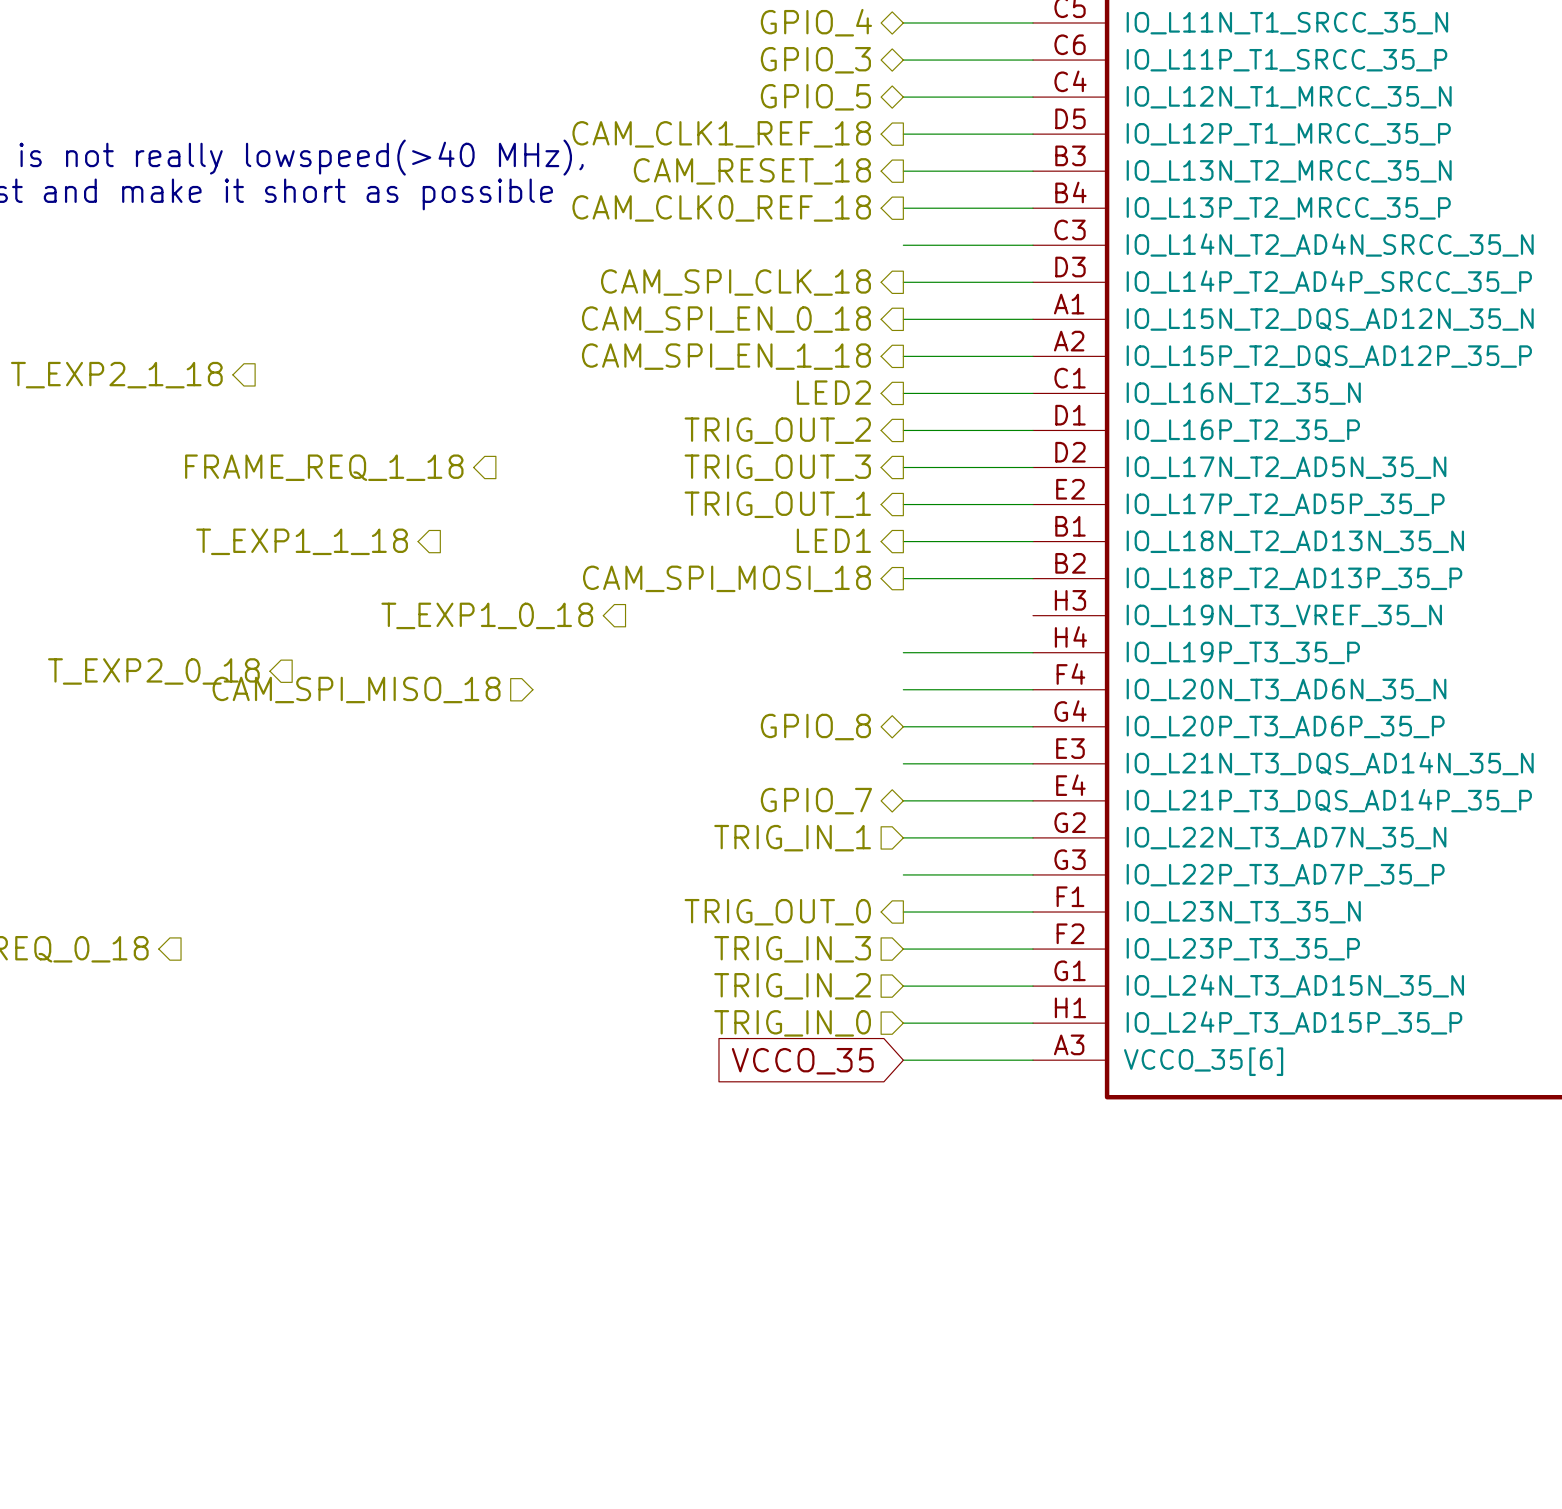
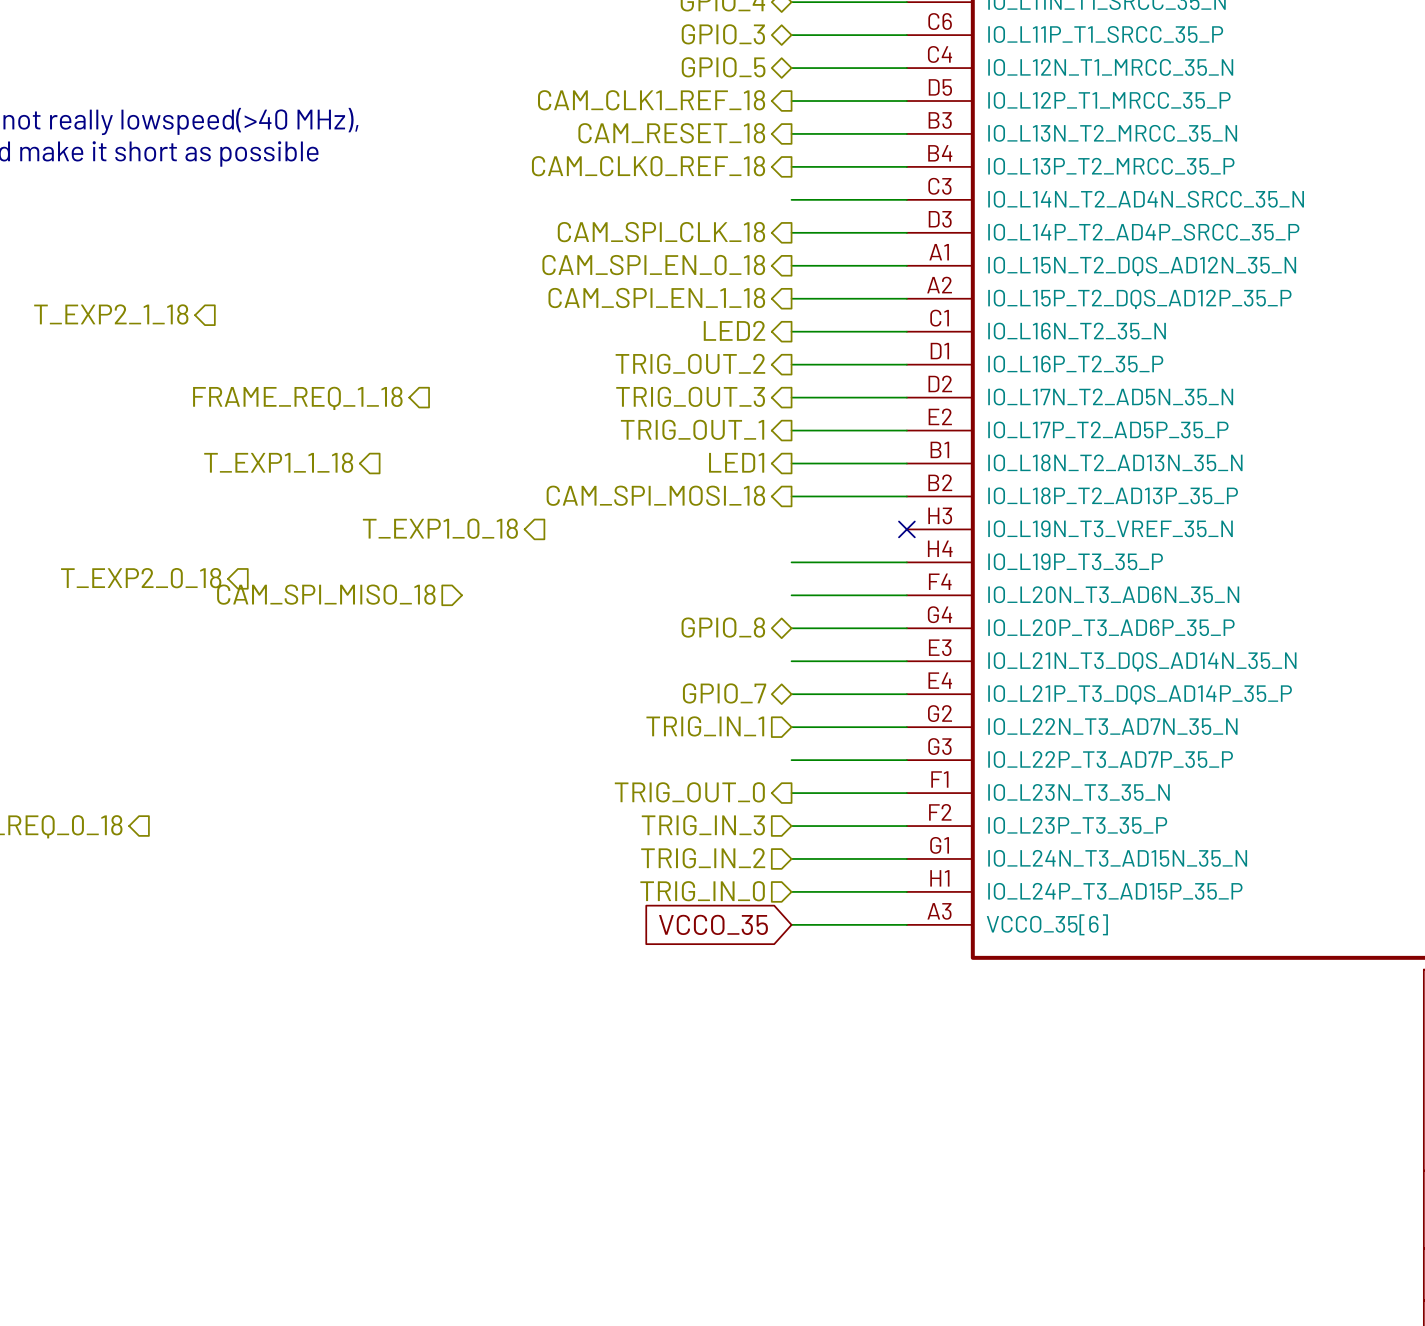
no-connect mark: none -> (906, 529)

